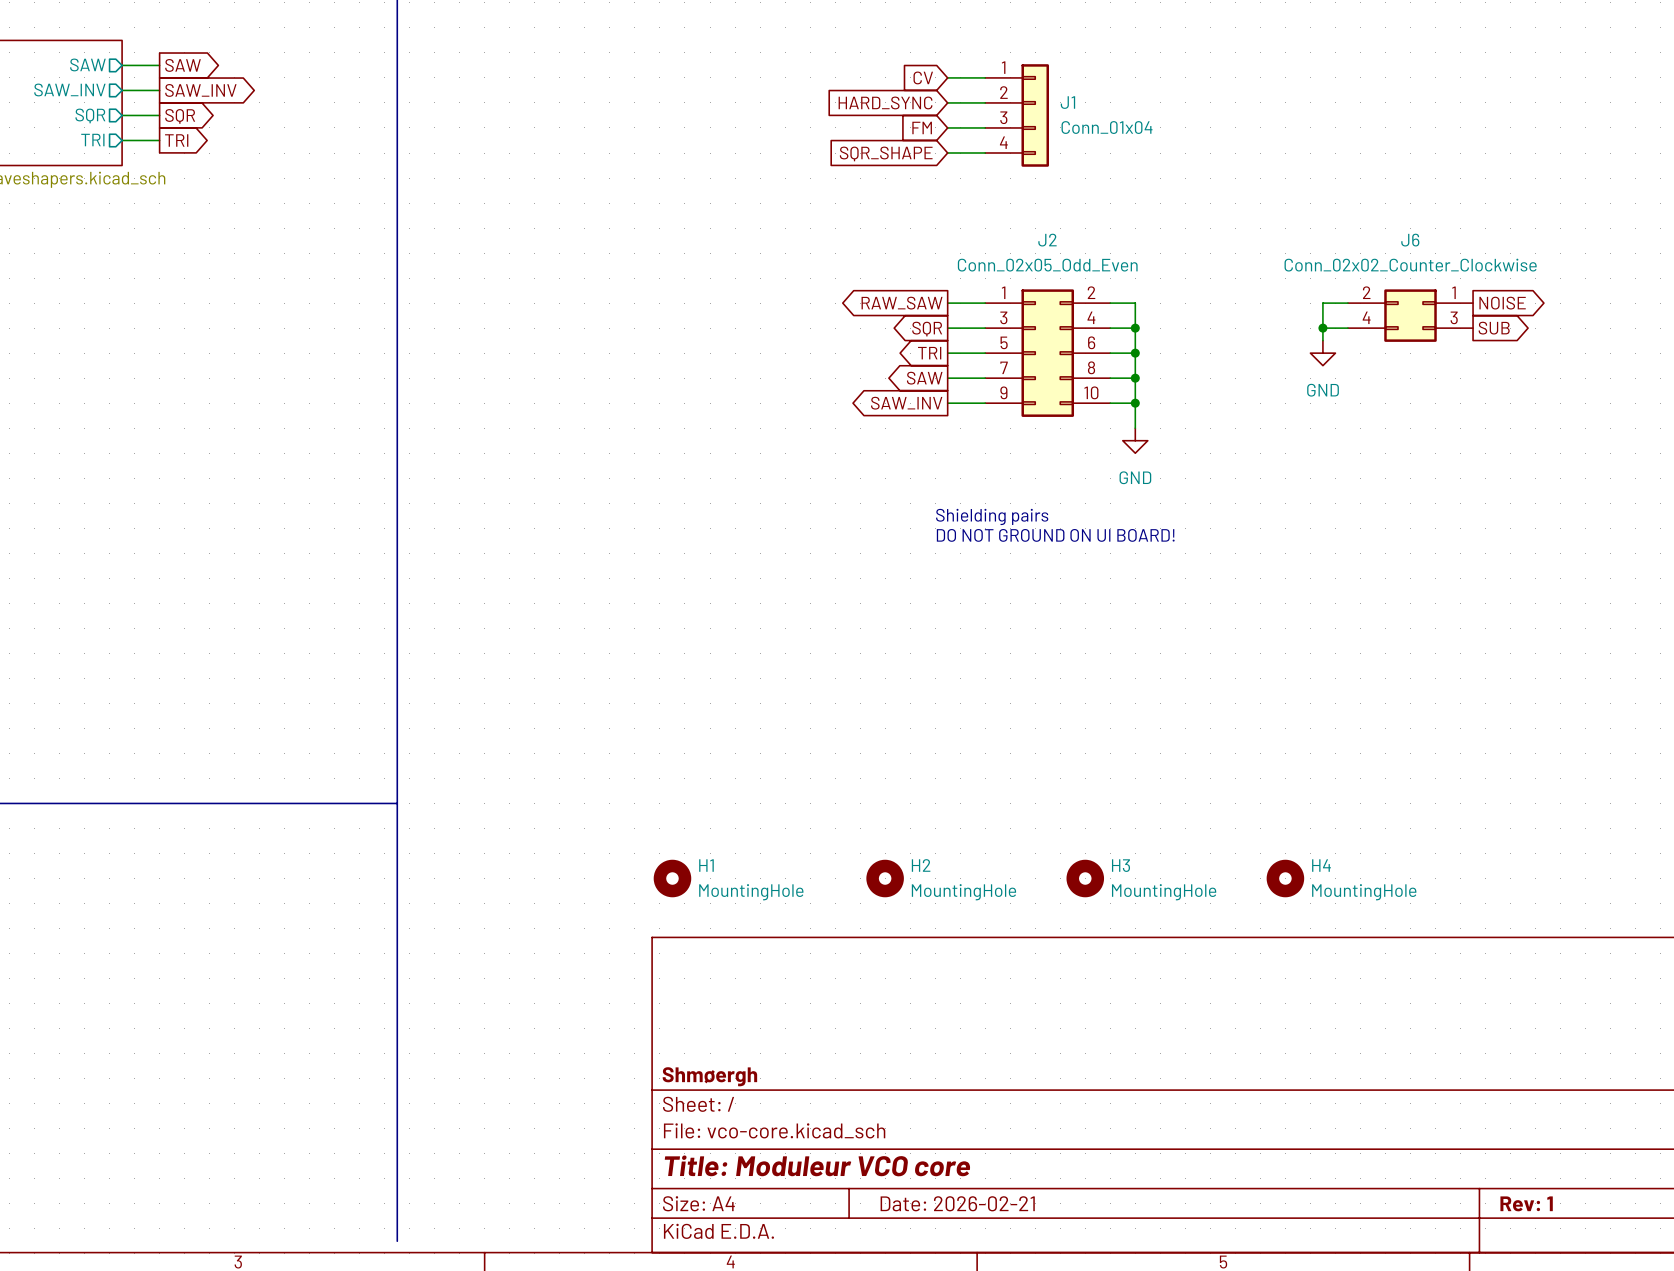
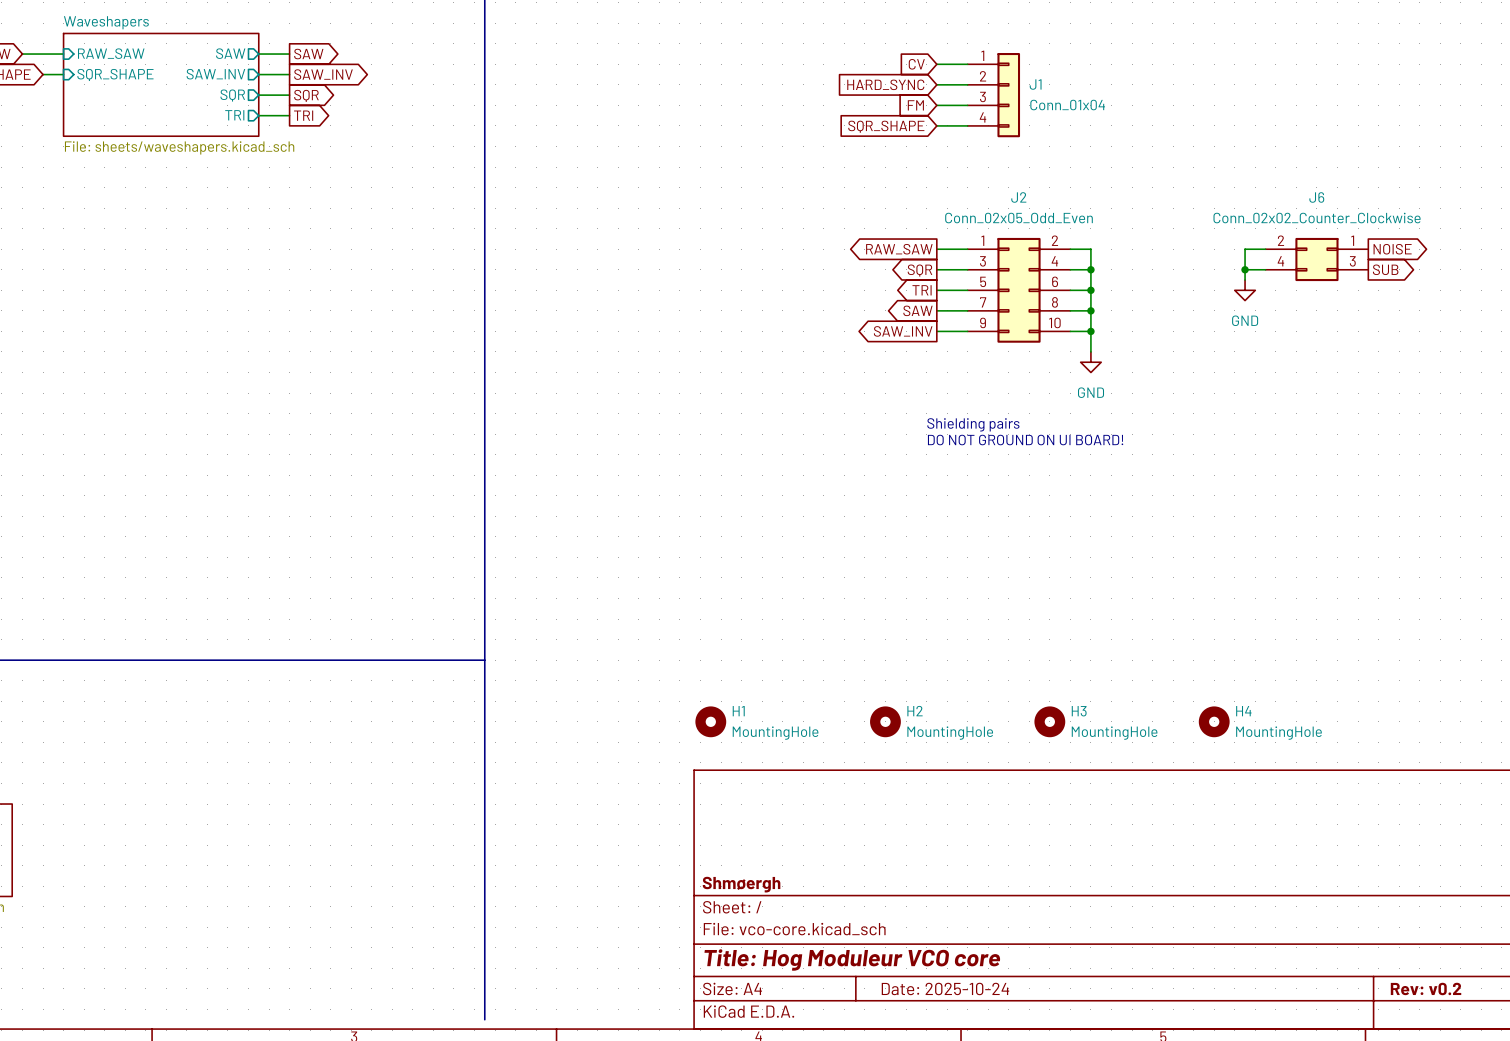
title block: Title: Moduleur VCO core (817, 1165) -> Title: Hog Moduleur VCO core (852, 960)
title block: Date: 2026-02-21 (957, 1203) -> Date: 2025-10-24 (945, 988)
title block: Rev: 1 (1526, 1203) -> Rev: v0.2 (1426, 988)

